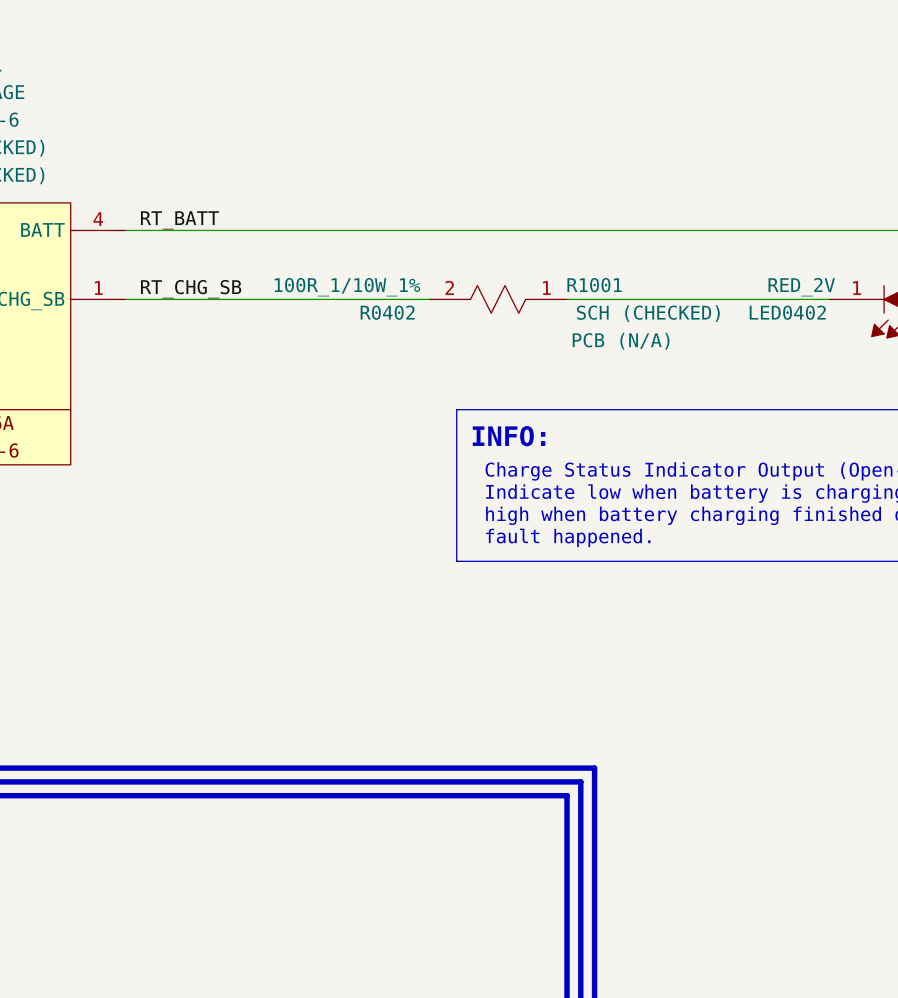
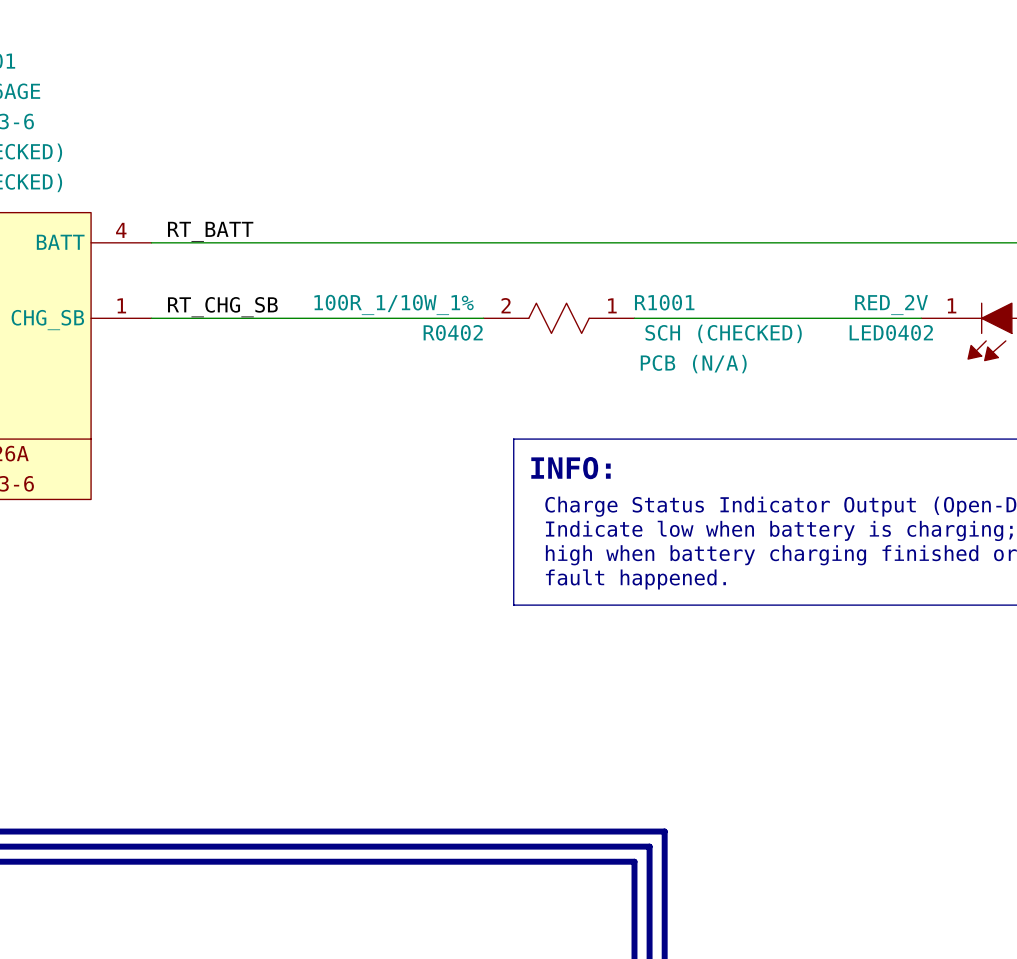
R1001 text position: R0402 (387, 312) -> R0402 (453, 332)
part text position: LED0402 (787, 312) -> LED0402 (891, 332)

